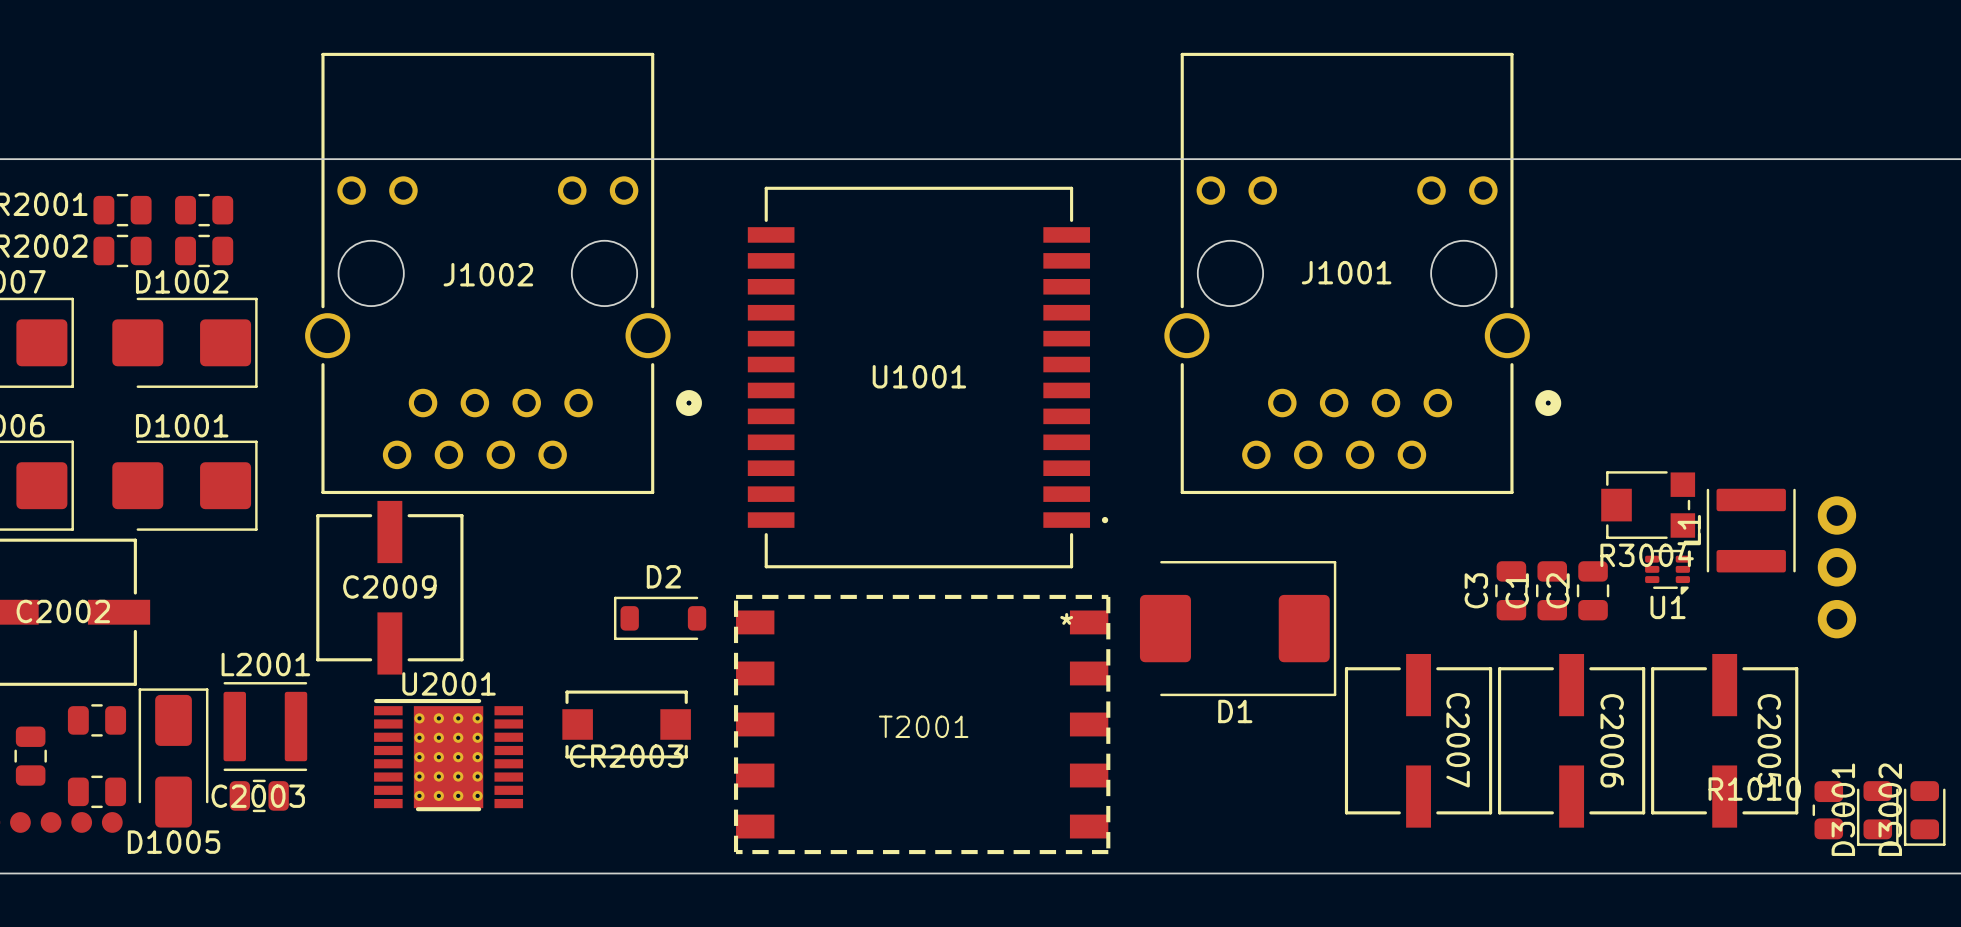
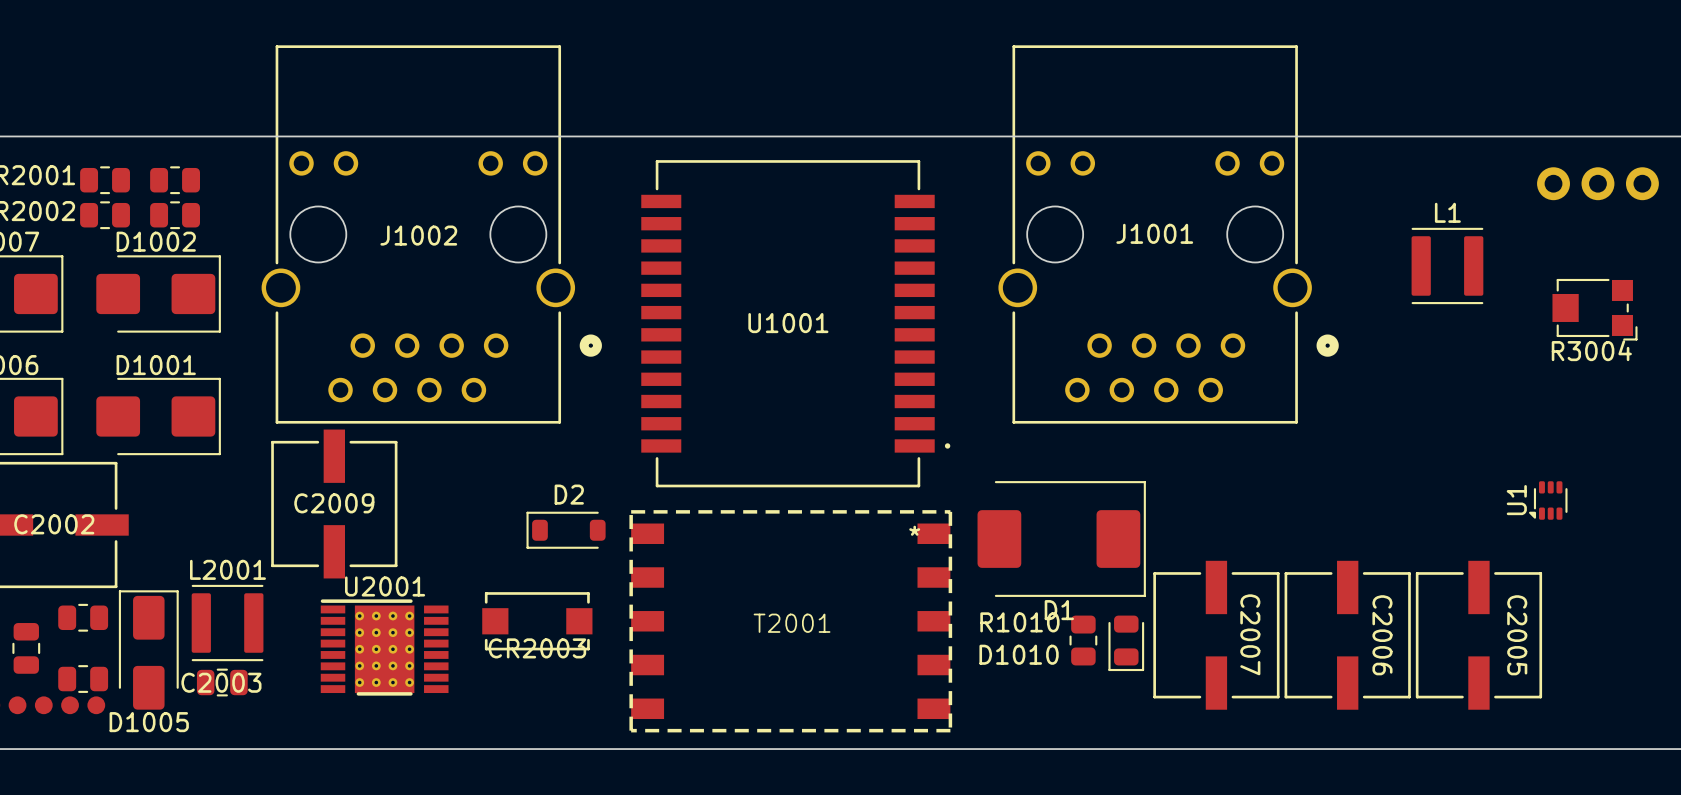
R3004 position: (1650, 507) -> (1594, 309)
L1 rotation: 0° (1751, 530) -> 90° clockwise (1447, 265)
L1 position: (1751, 530) -> (1447, 265)
part rotation: 0° (1836, 567) -> 90° clockwise (1597, 183)
part position: (1836, 567) -> (1597, 183)
U1 rotation: 0° (1667, 572) -> 90° clockwise (1548, 500)
U1 position: (1667, 572) -> (1548, 500)
C3: (1511, 590) -> none
C1: (1552, 590) -> none
C2: (1593, 590) -> none
D1010: none -> (1126, 643)
R1010 position: (1828, 810) -> (1083, 640)
D3001: (1877, 813) -> none
D3002: (1924, 813) -> none

